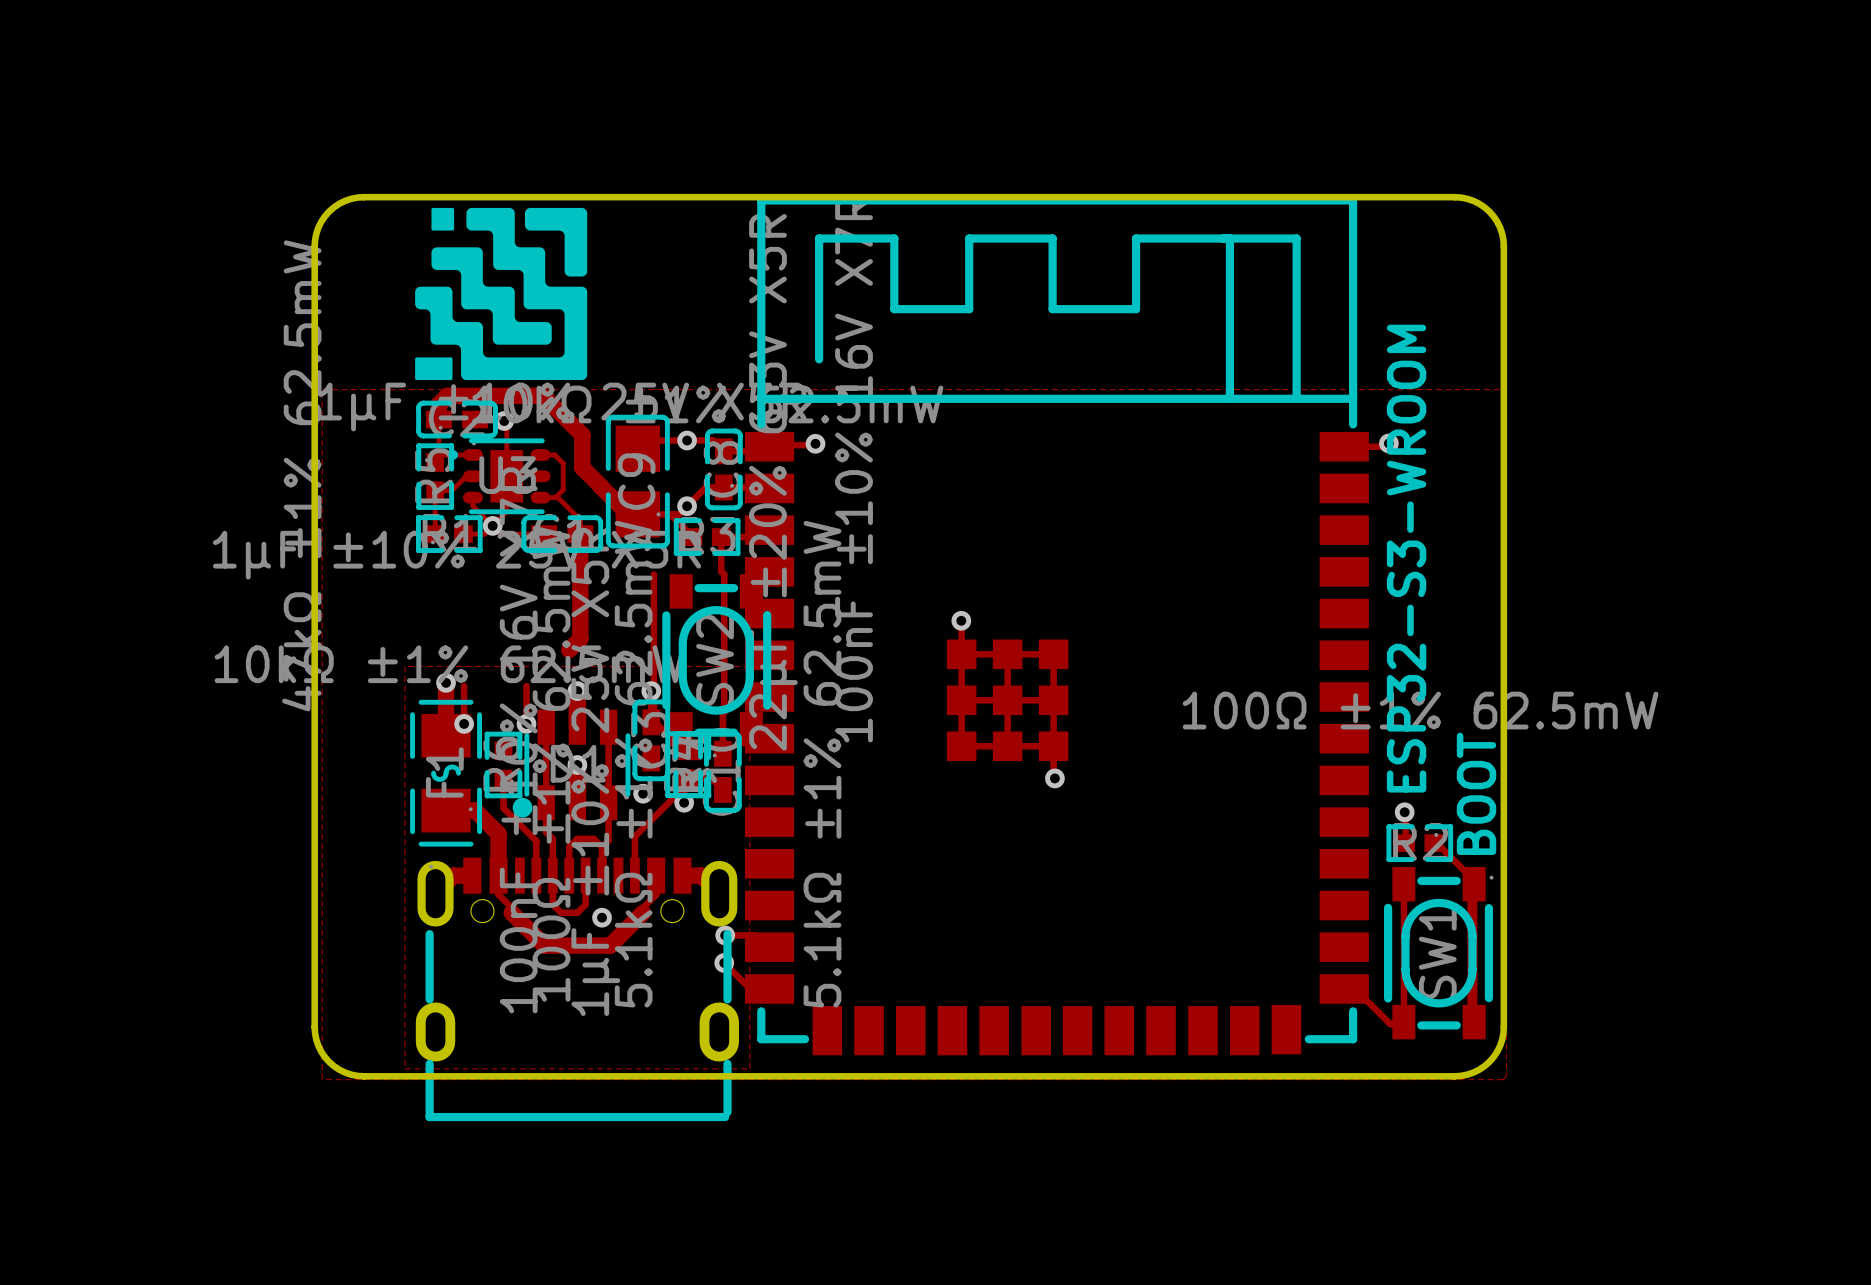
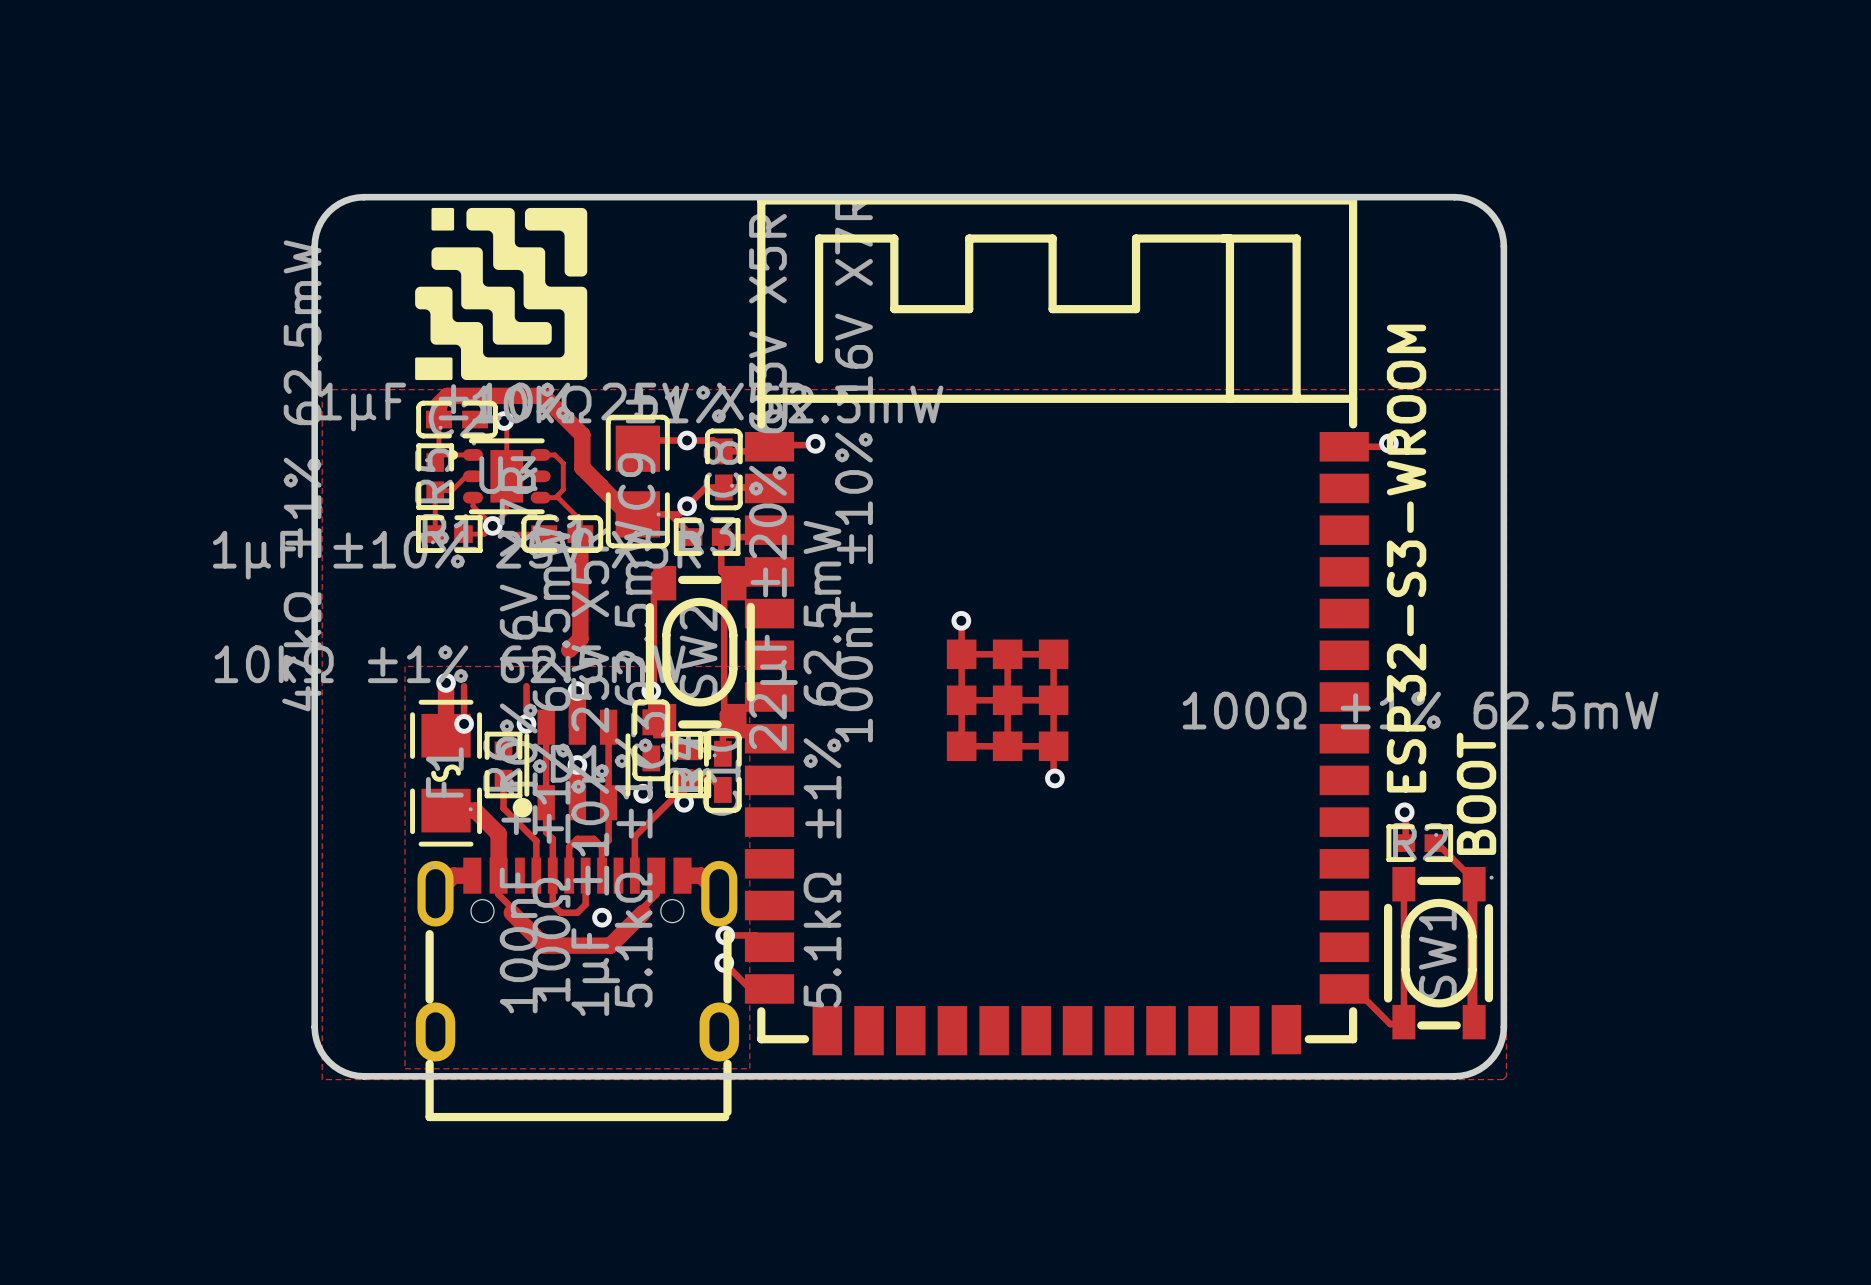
SW2 position: (716, 660) -> (700, 652)

